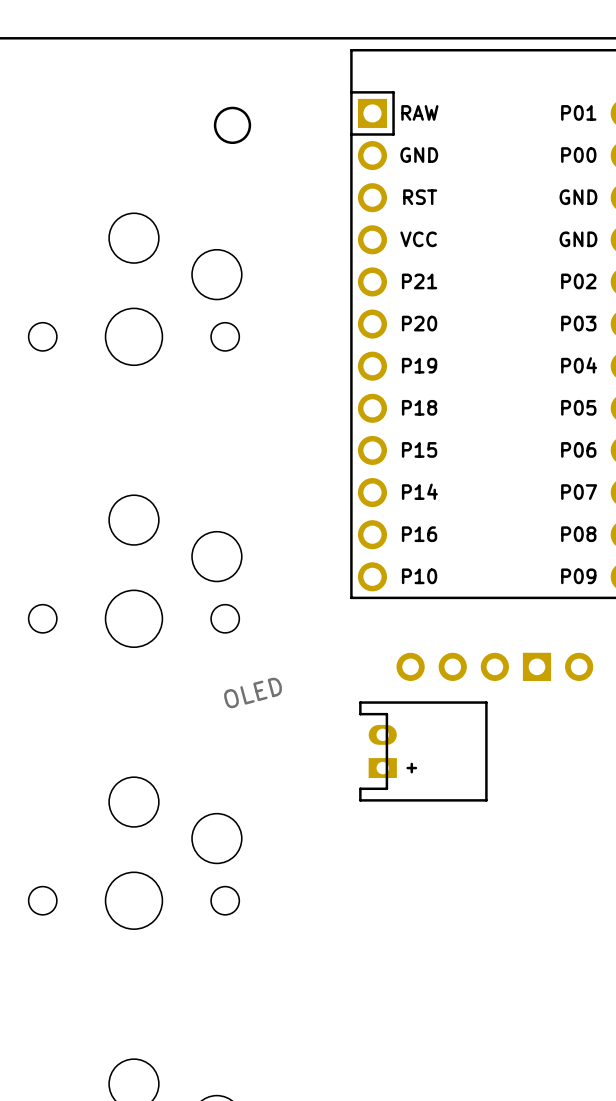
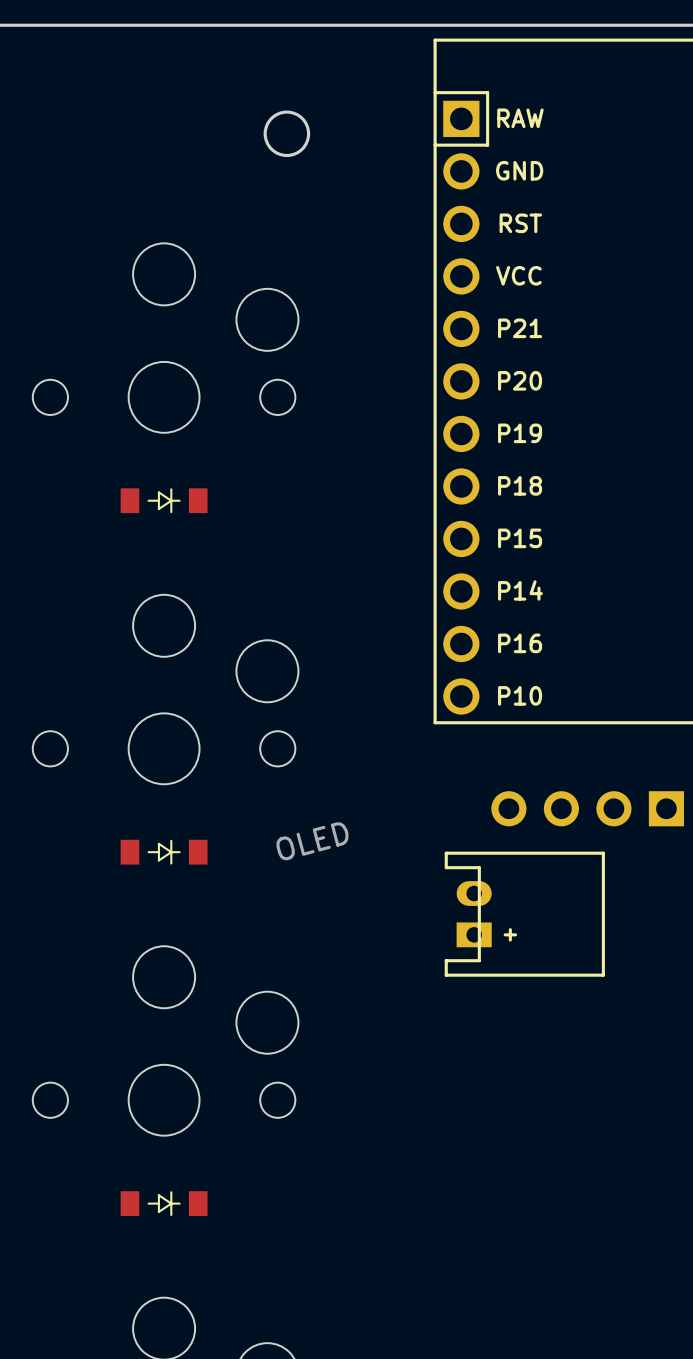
part: none -> (164, 500)
part: none -> (164, 852)
part: none -> (164, 1203)

